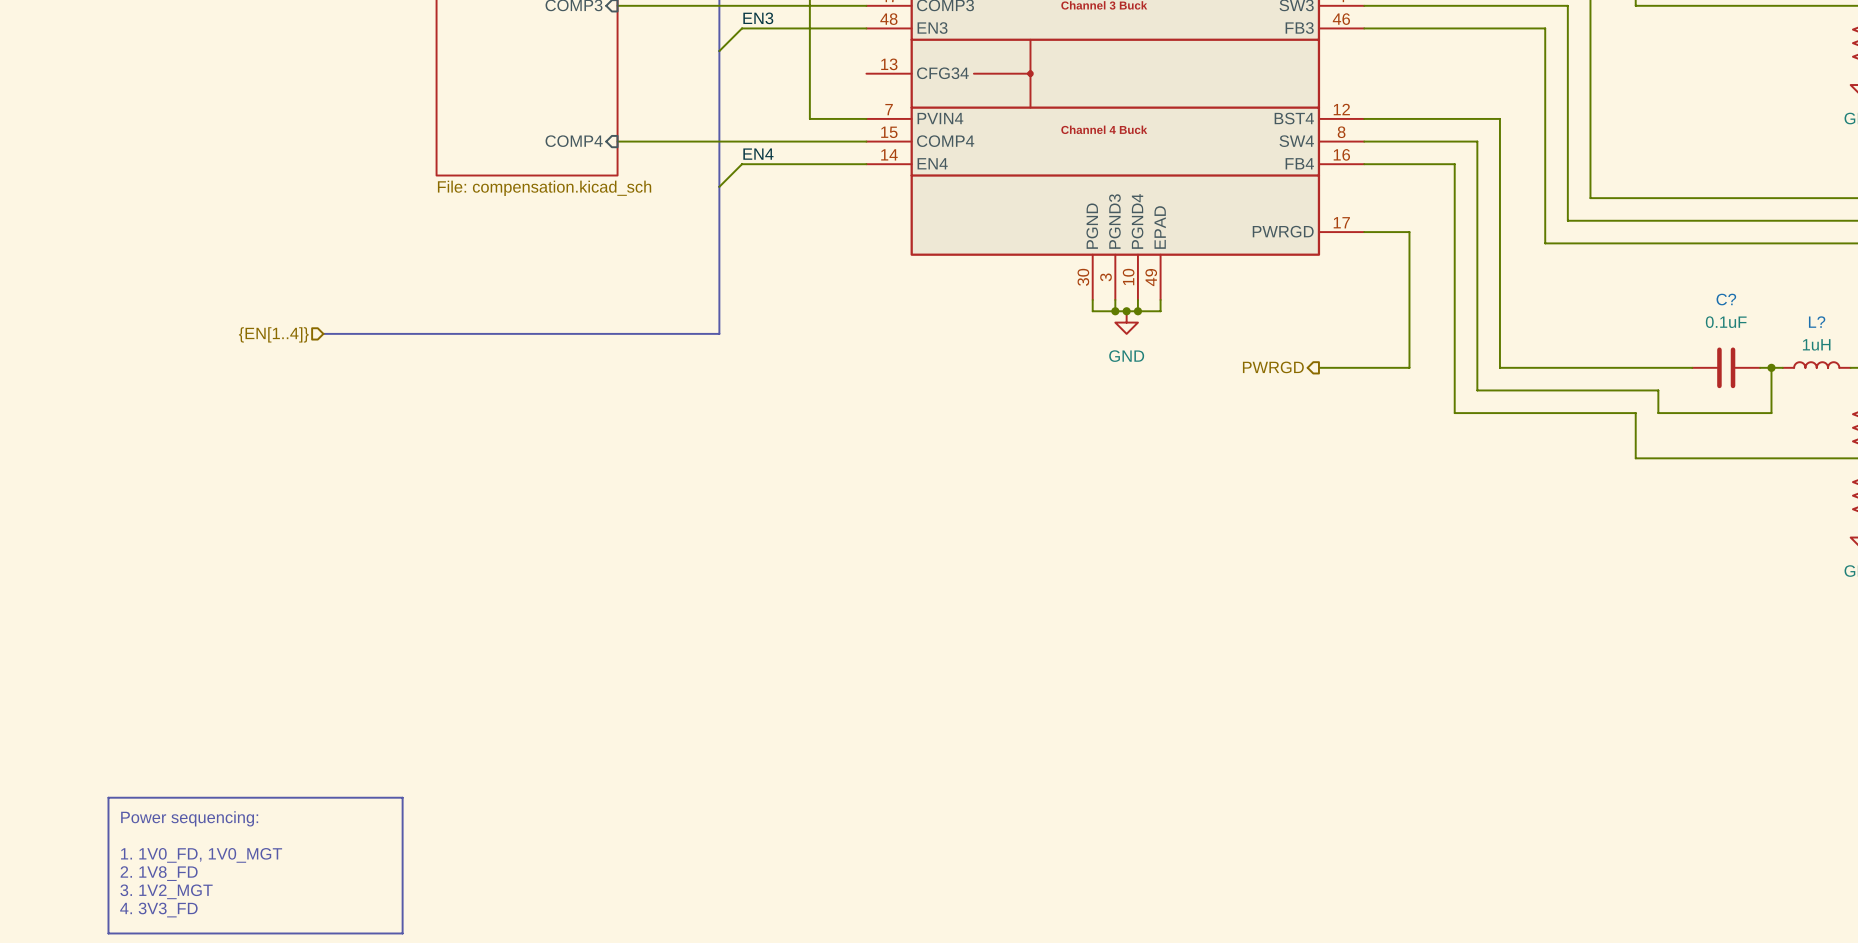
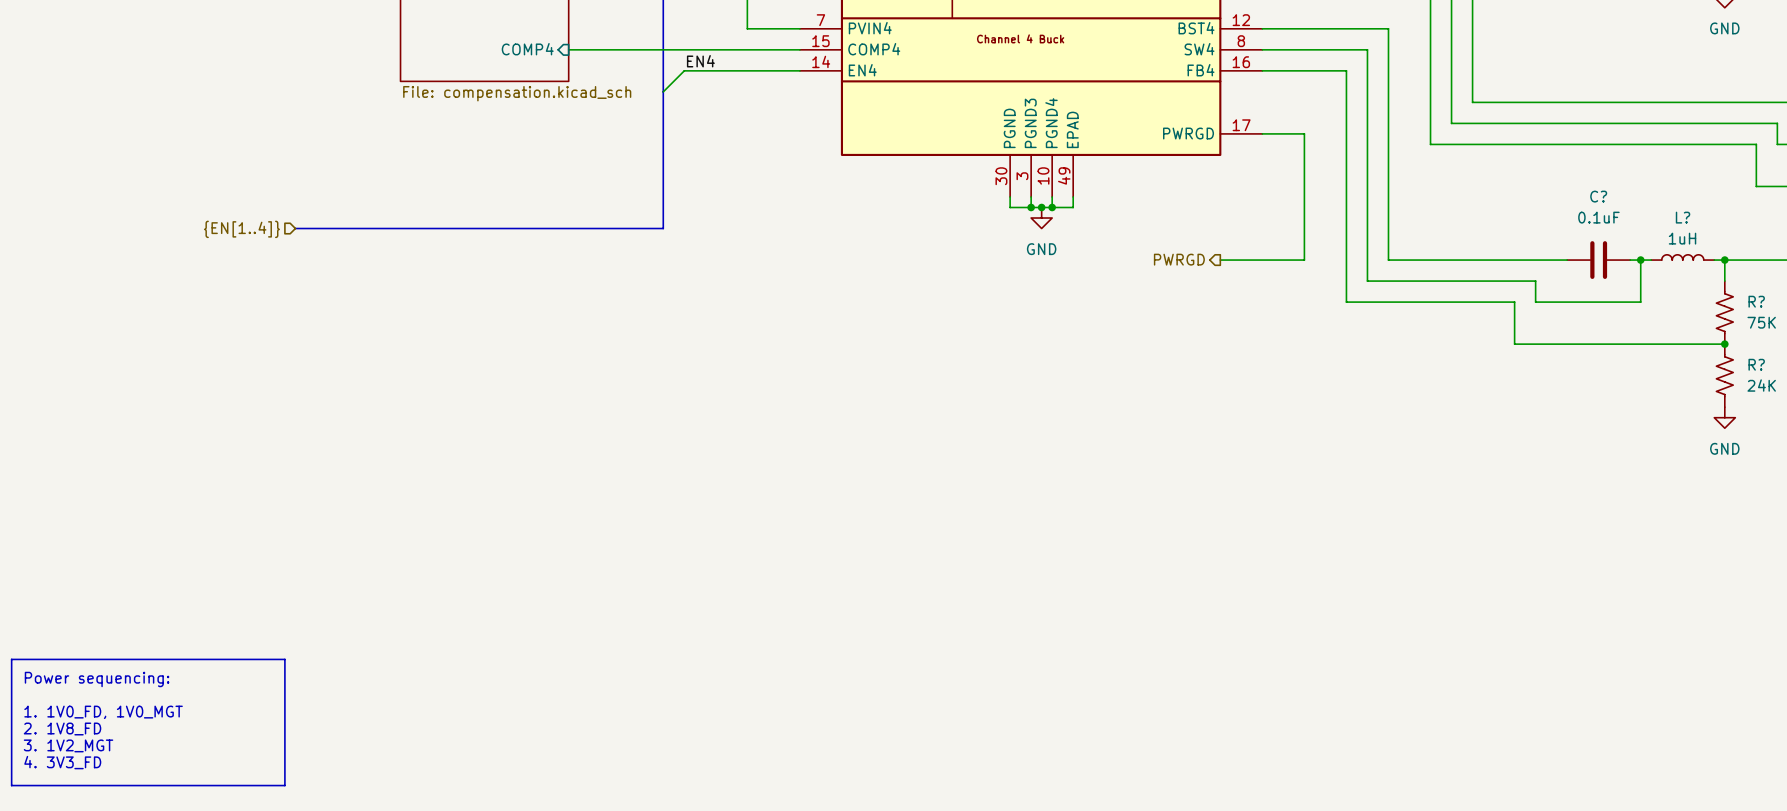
line: (108, 797) (108, 933) -> (95, 659) (11, 659) (11, 785) (95, 785)
line: (312, 797) (402, 797) (402, 933) (312, 933) -> (284, 659) (284, 785)
text position: Power sequencing: (189, 818) -> Power sequencing: (97, 679)
text position: 1. 1V0_FD, 1V0_MGT (201, 855) -> 1. 1V0_FD, 1V0_MGT (103, 712)
text position: 2. 1V8_FD (159, 873) -> 2. 1V8_FD (62, 729)
text position: 3. 1V2_MGT (166, 891) -> 3. 1V2_MGT (68, 745)
text position: 4. 3V3_FD (158, 910) -> 4. 3V3_FD (62, 762)

